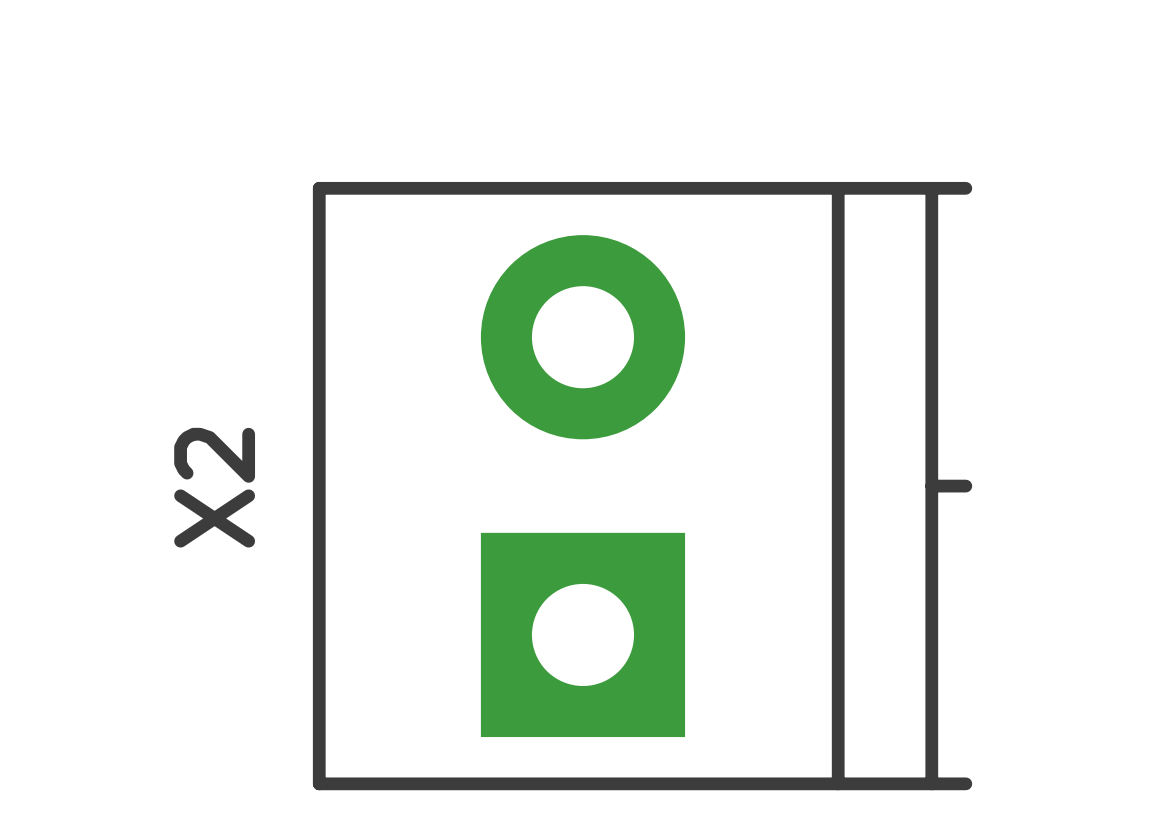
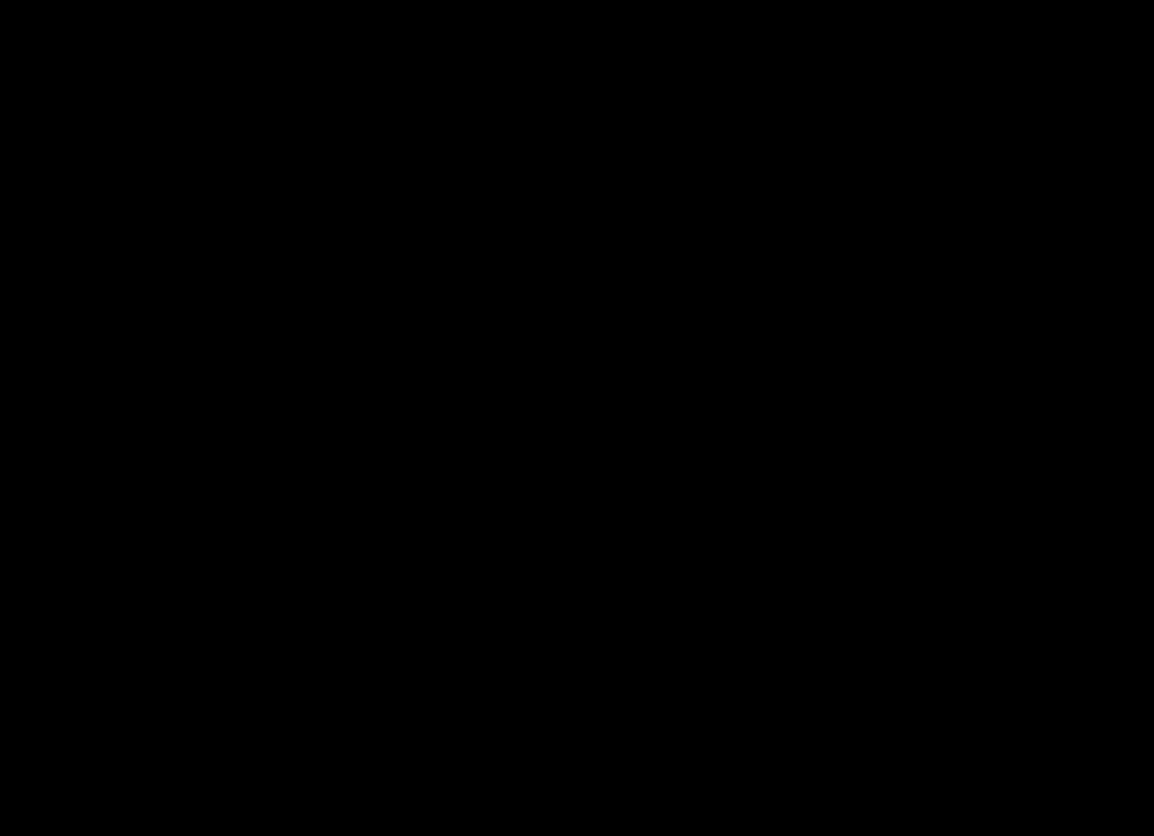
X2: (642, 486) -> none

